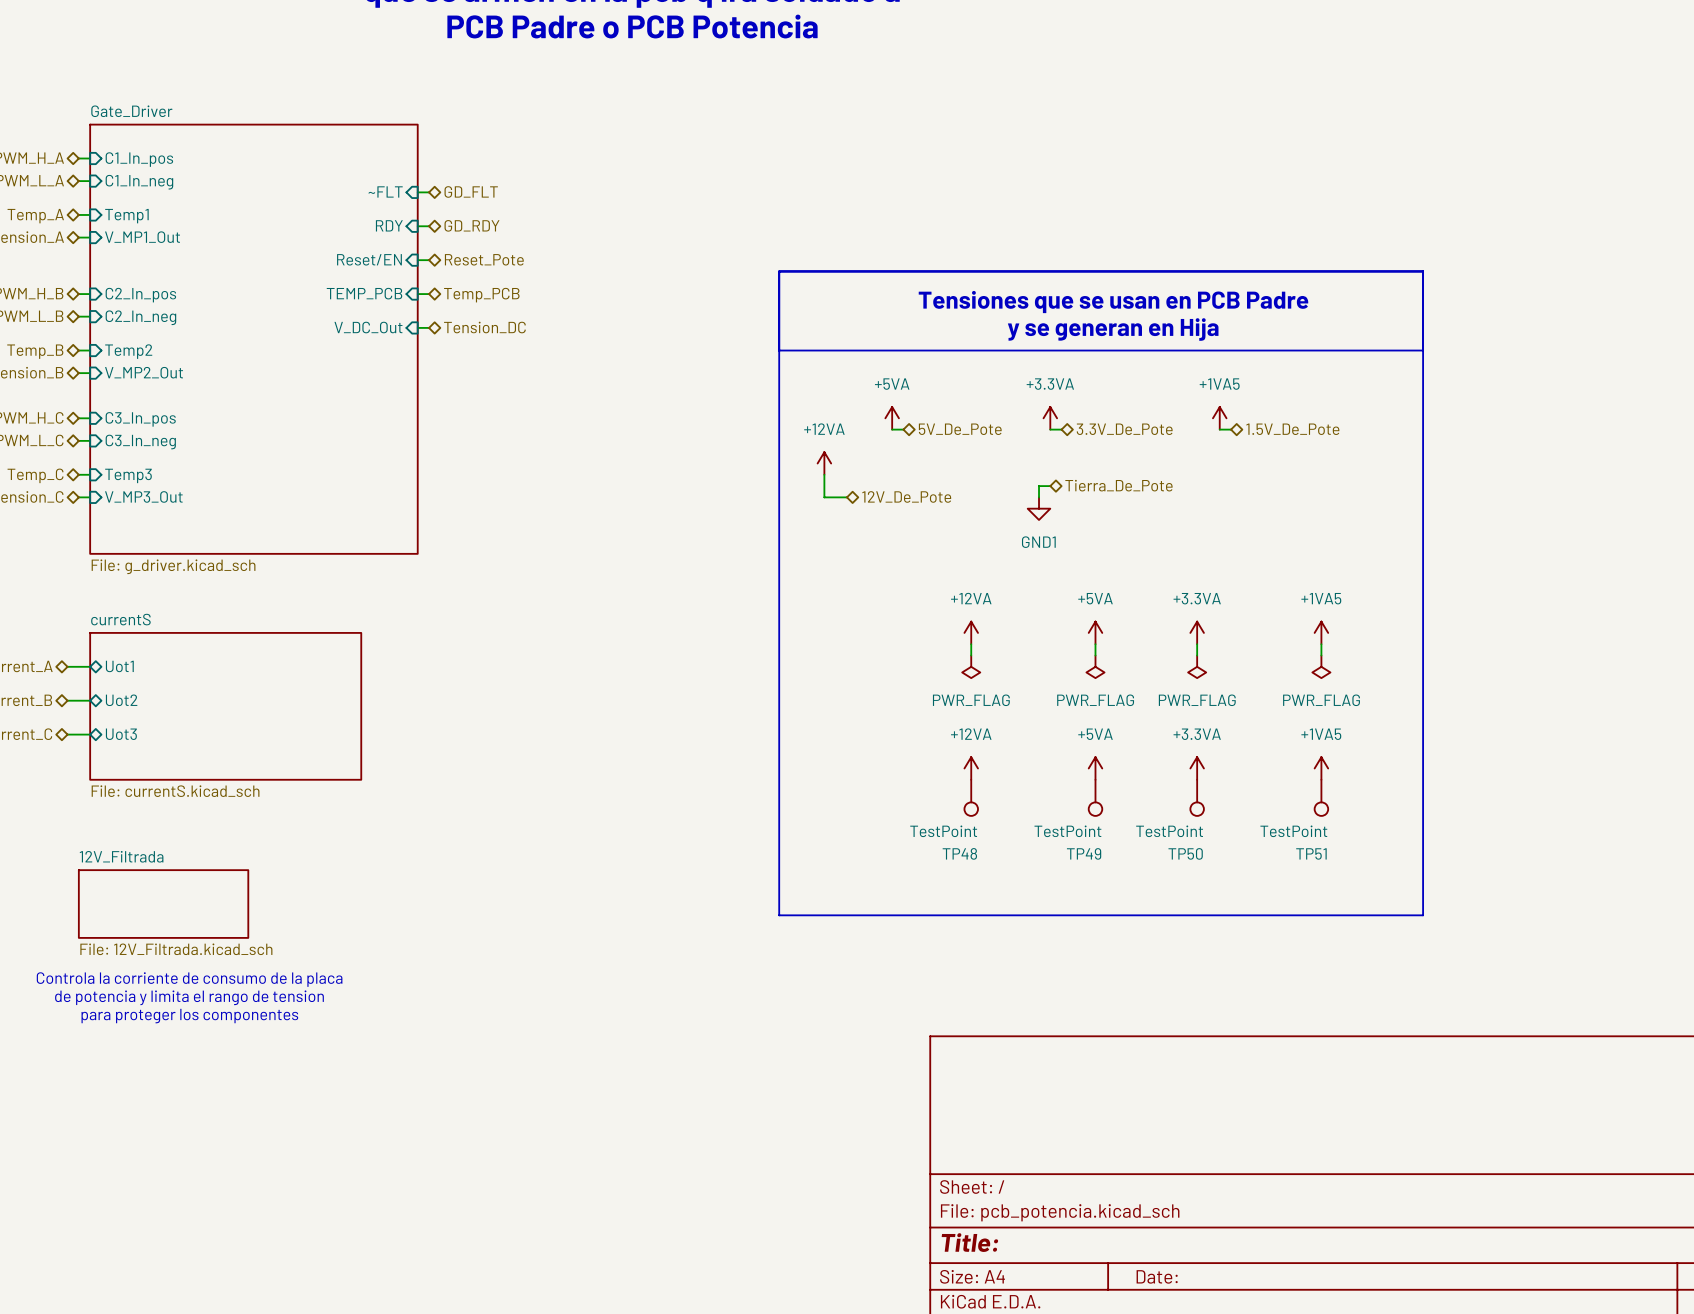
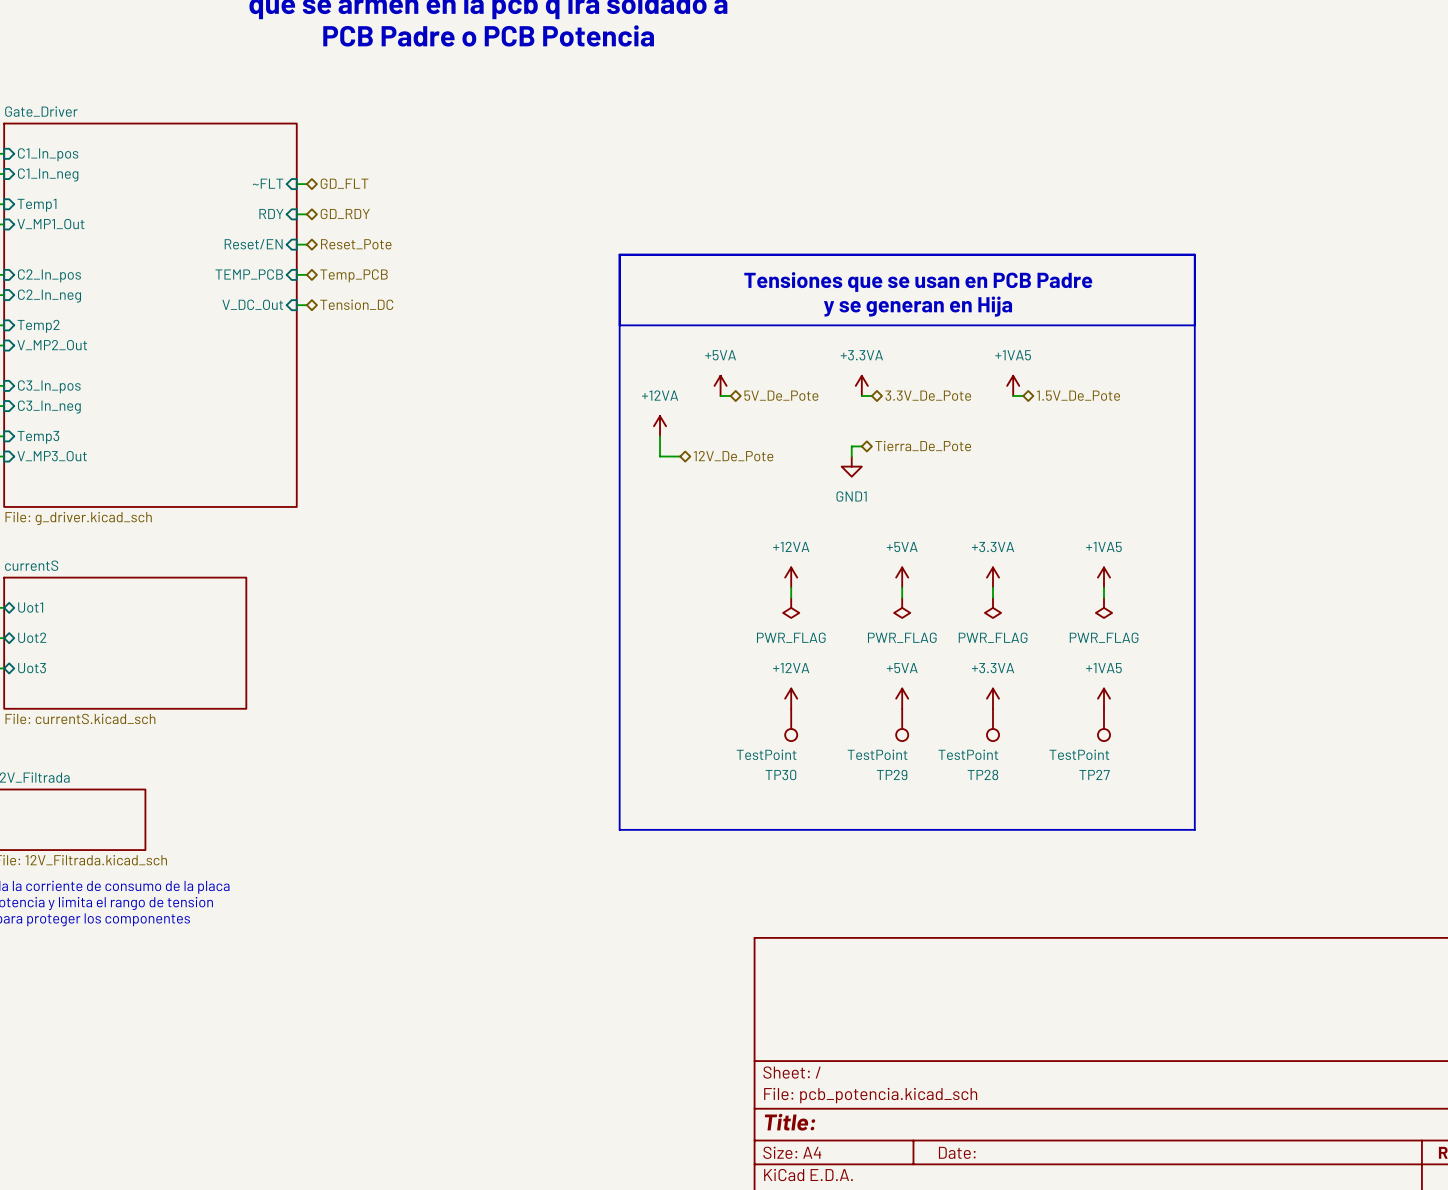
TP48 name: TP48 (959, 853) -> TP30 (780, 775)
TP49 name: TP49 (1084, 853) -> TP29 (892, 775)
TP50 name: TP50 (1185, 853) -> TP28 (982, 774)
TP51 name: TP51 (1311, 853) -> TP27 (1094, 774)

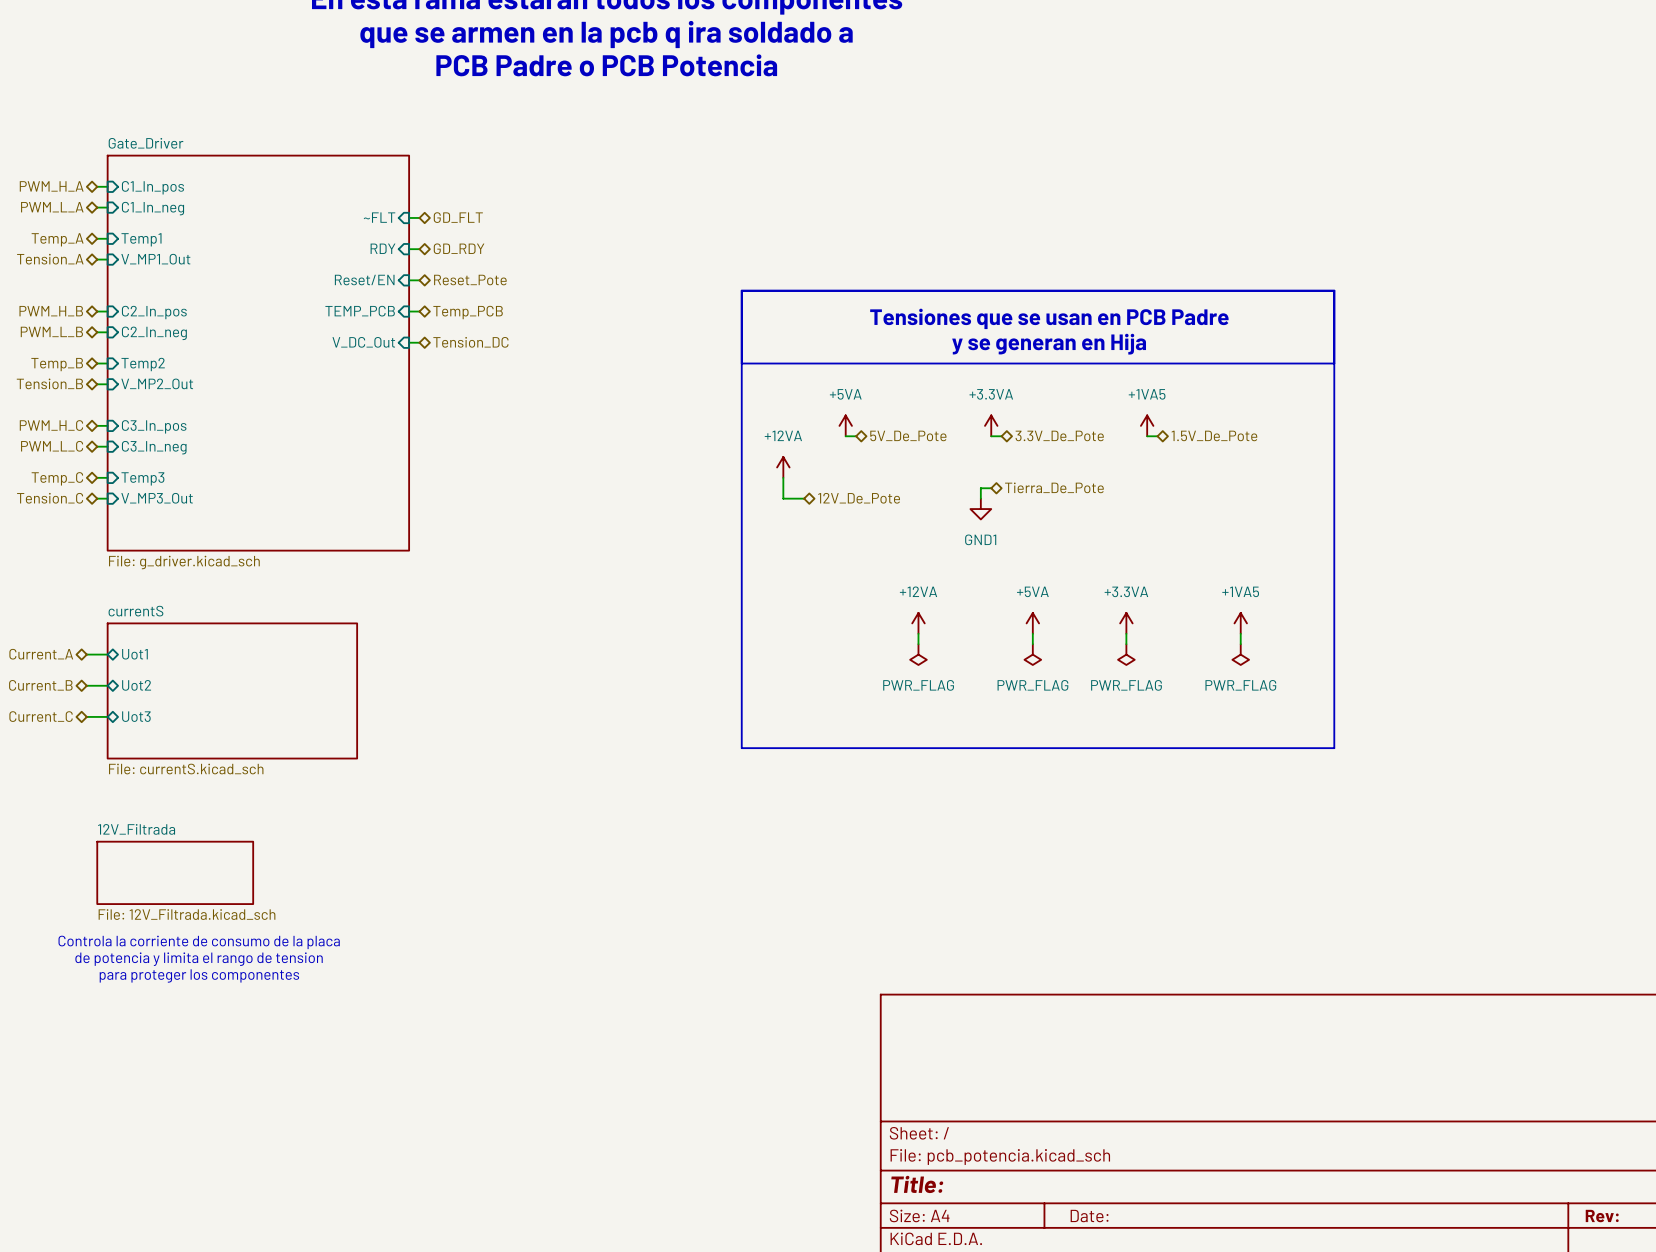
line: (619, 698) (619, 829) (1194, 829) (1194, 698) -> (741, 748) (1334, 748)
power symbol: +12VA (791, 698) -> none
power symbol: +5VA (902, 698) -> none
power symbol: +3.3VA (993, 698) -> none
power symbol: +1VA5 (1103, 698) -> none
TP30: TestPoint (791, 724) -> none
TP29: TestPoint (902, 724) -> none
TP28: TestPoint (993, 724) -> none
TP27: TestPoint (1103, 724) -> none

